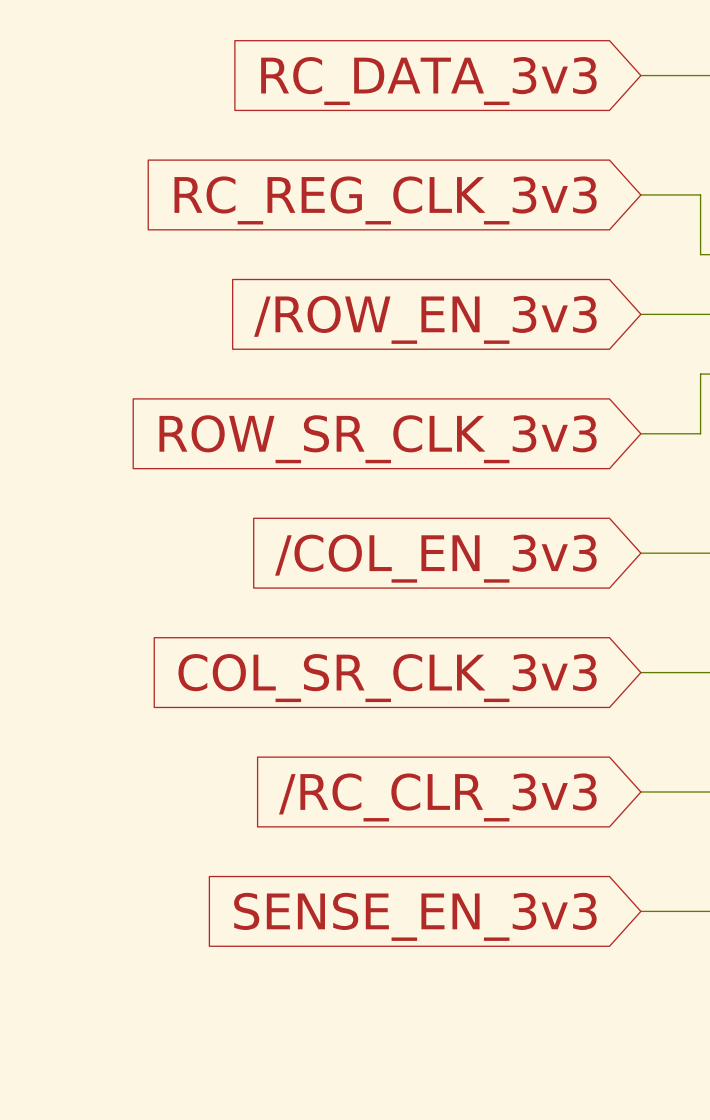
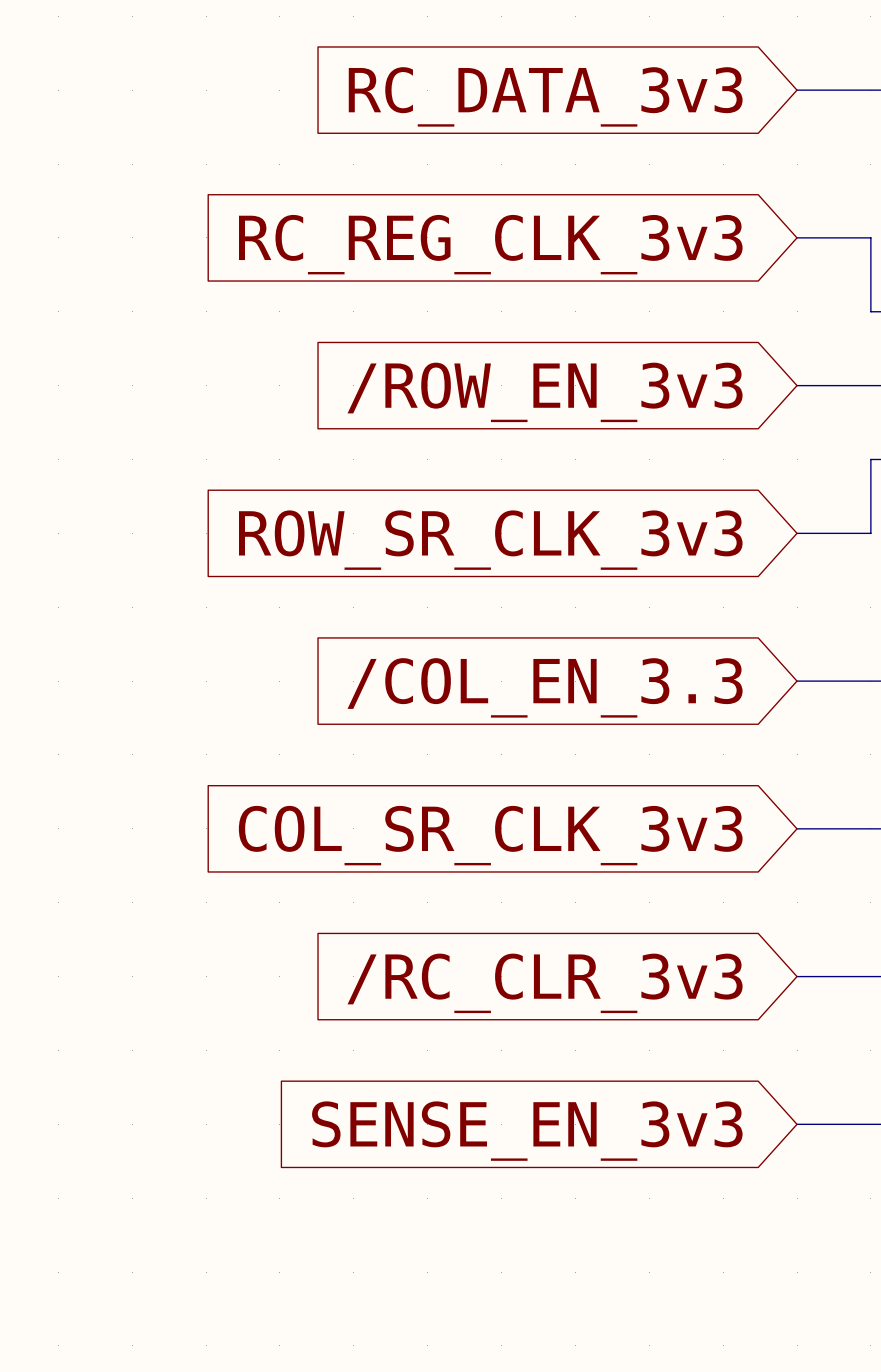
global label: /COL_EN_3v3 (435, 558) -> /COL_EN_3.3 (545, 687)

